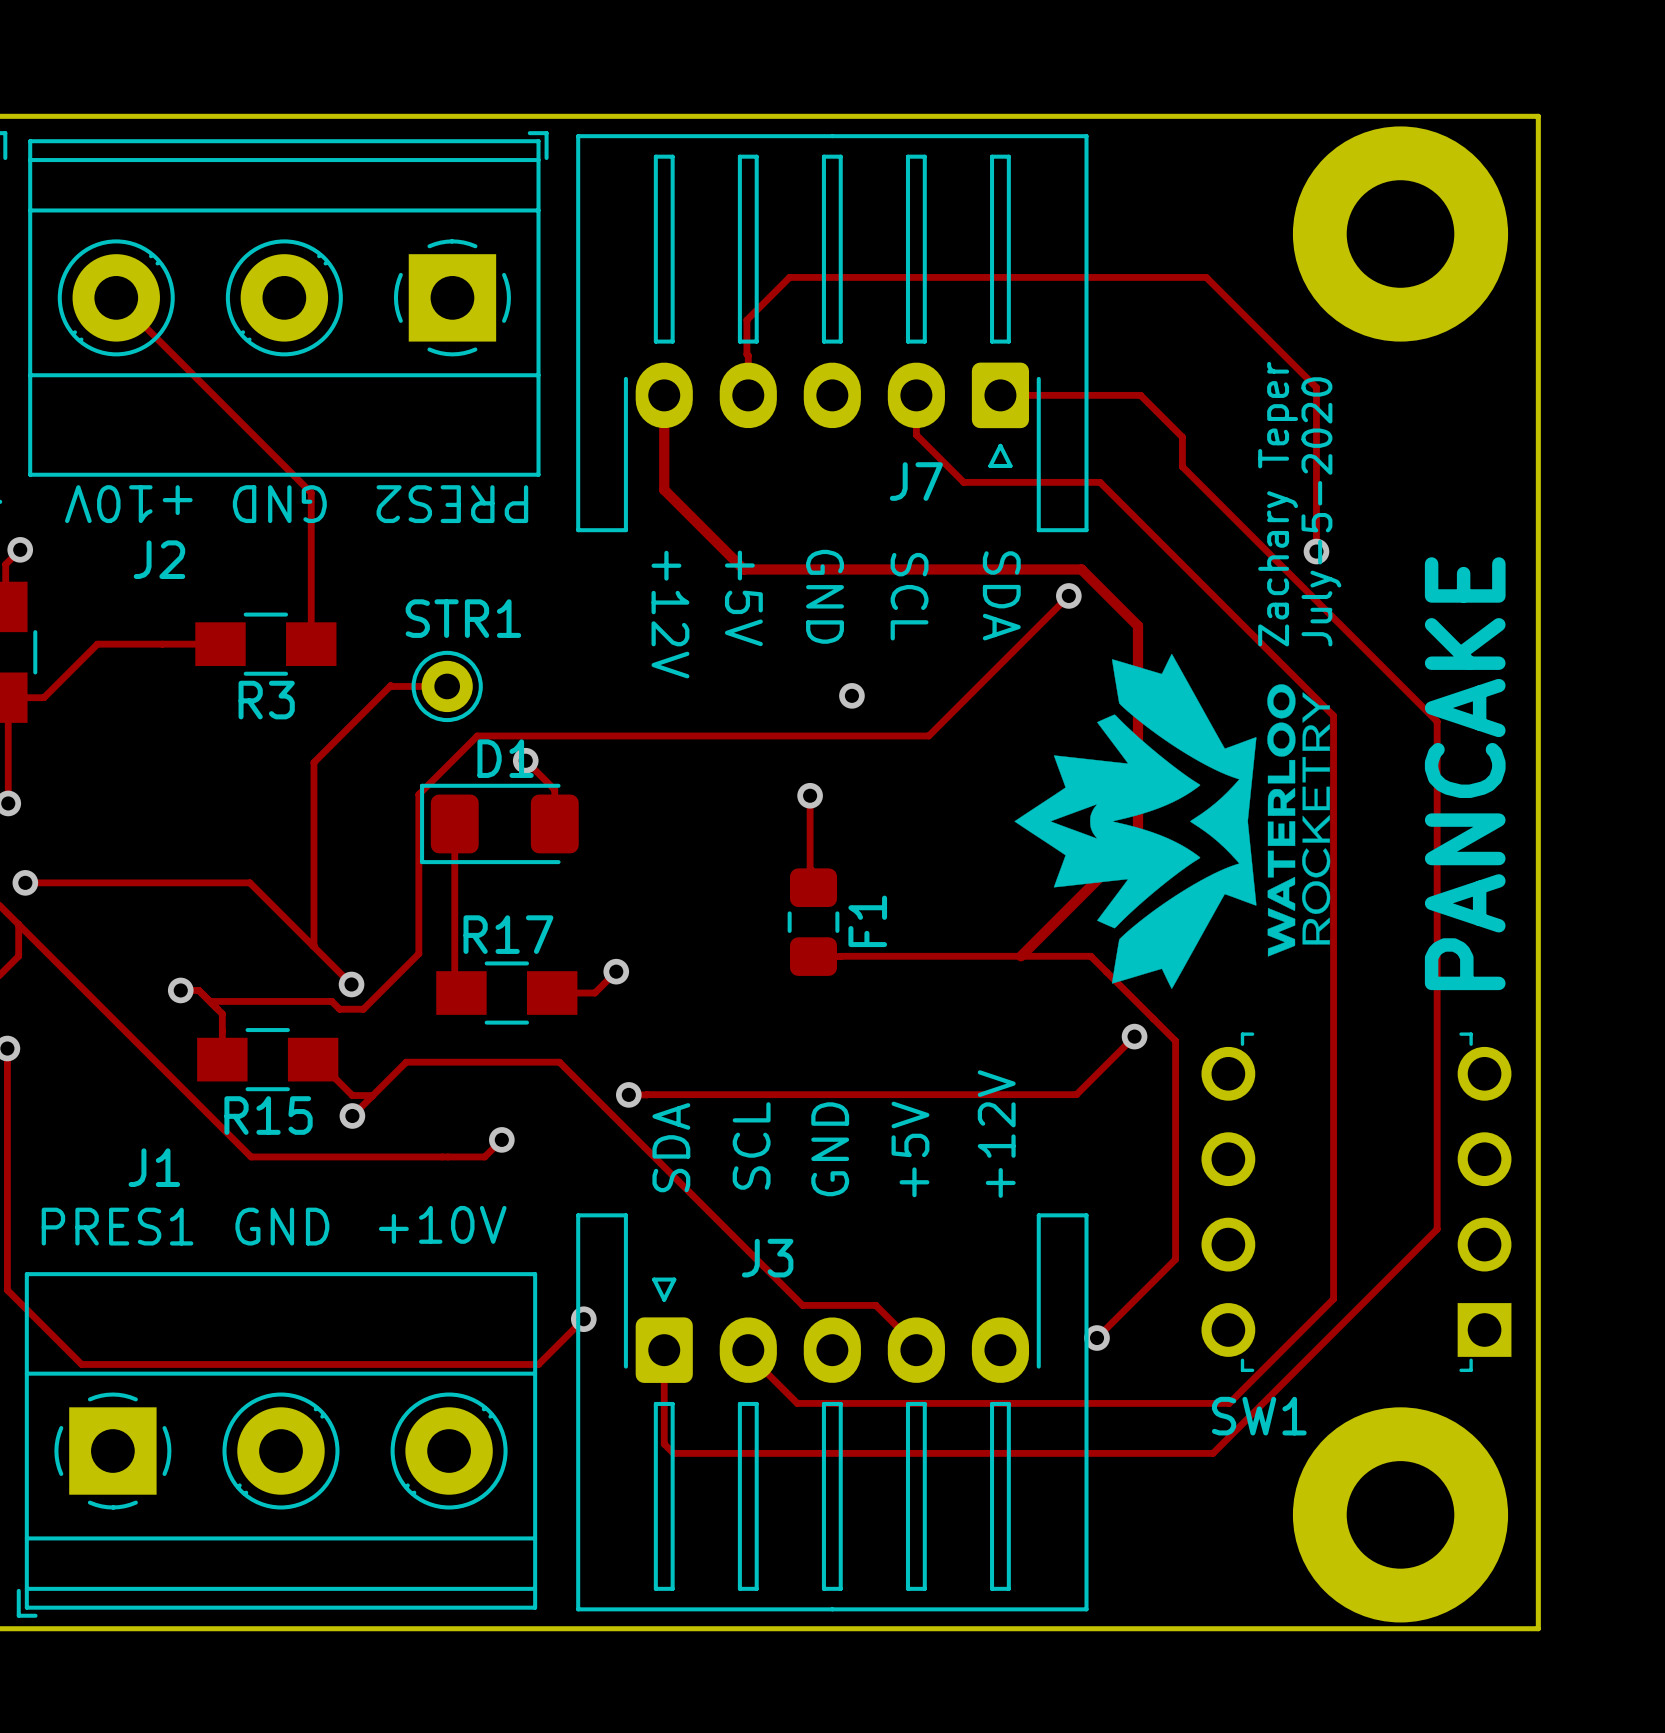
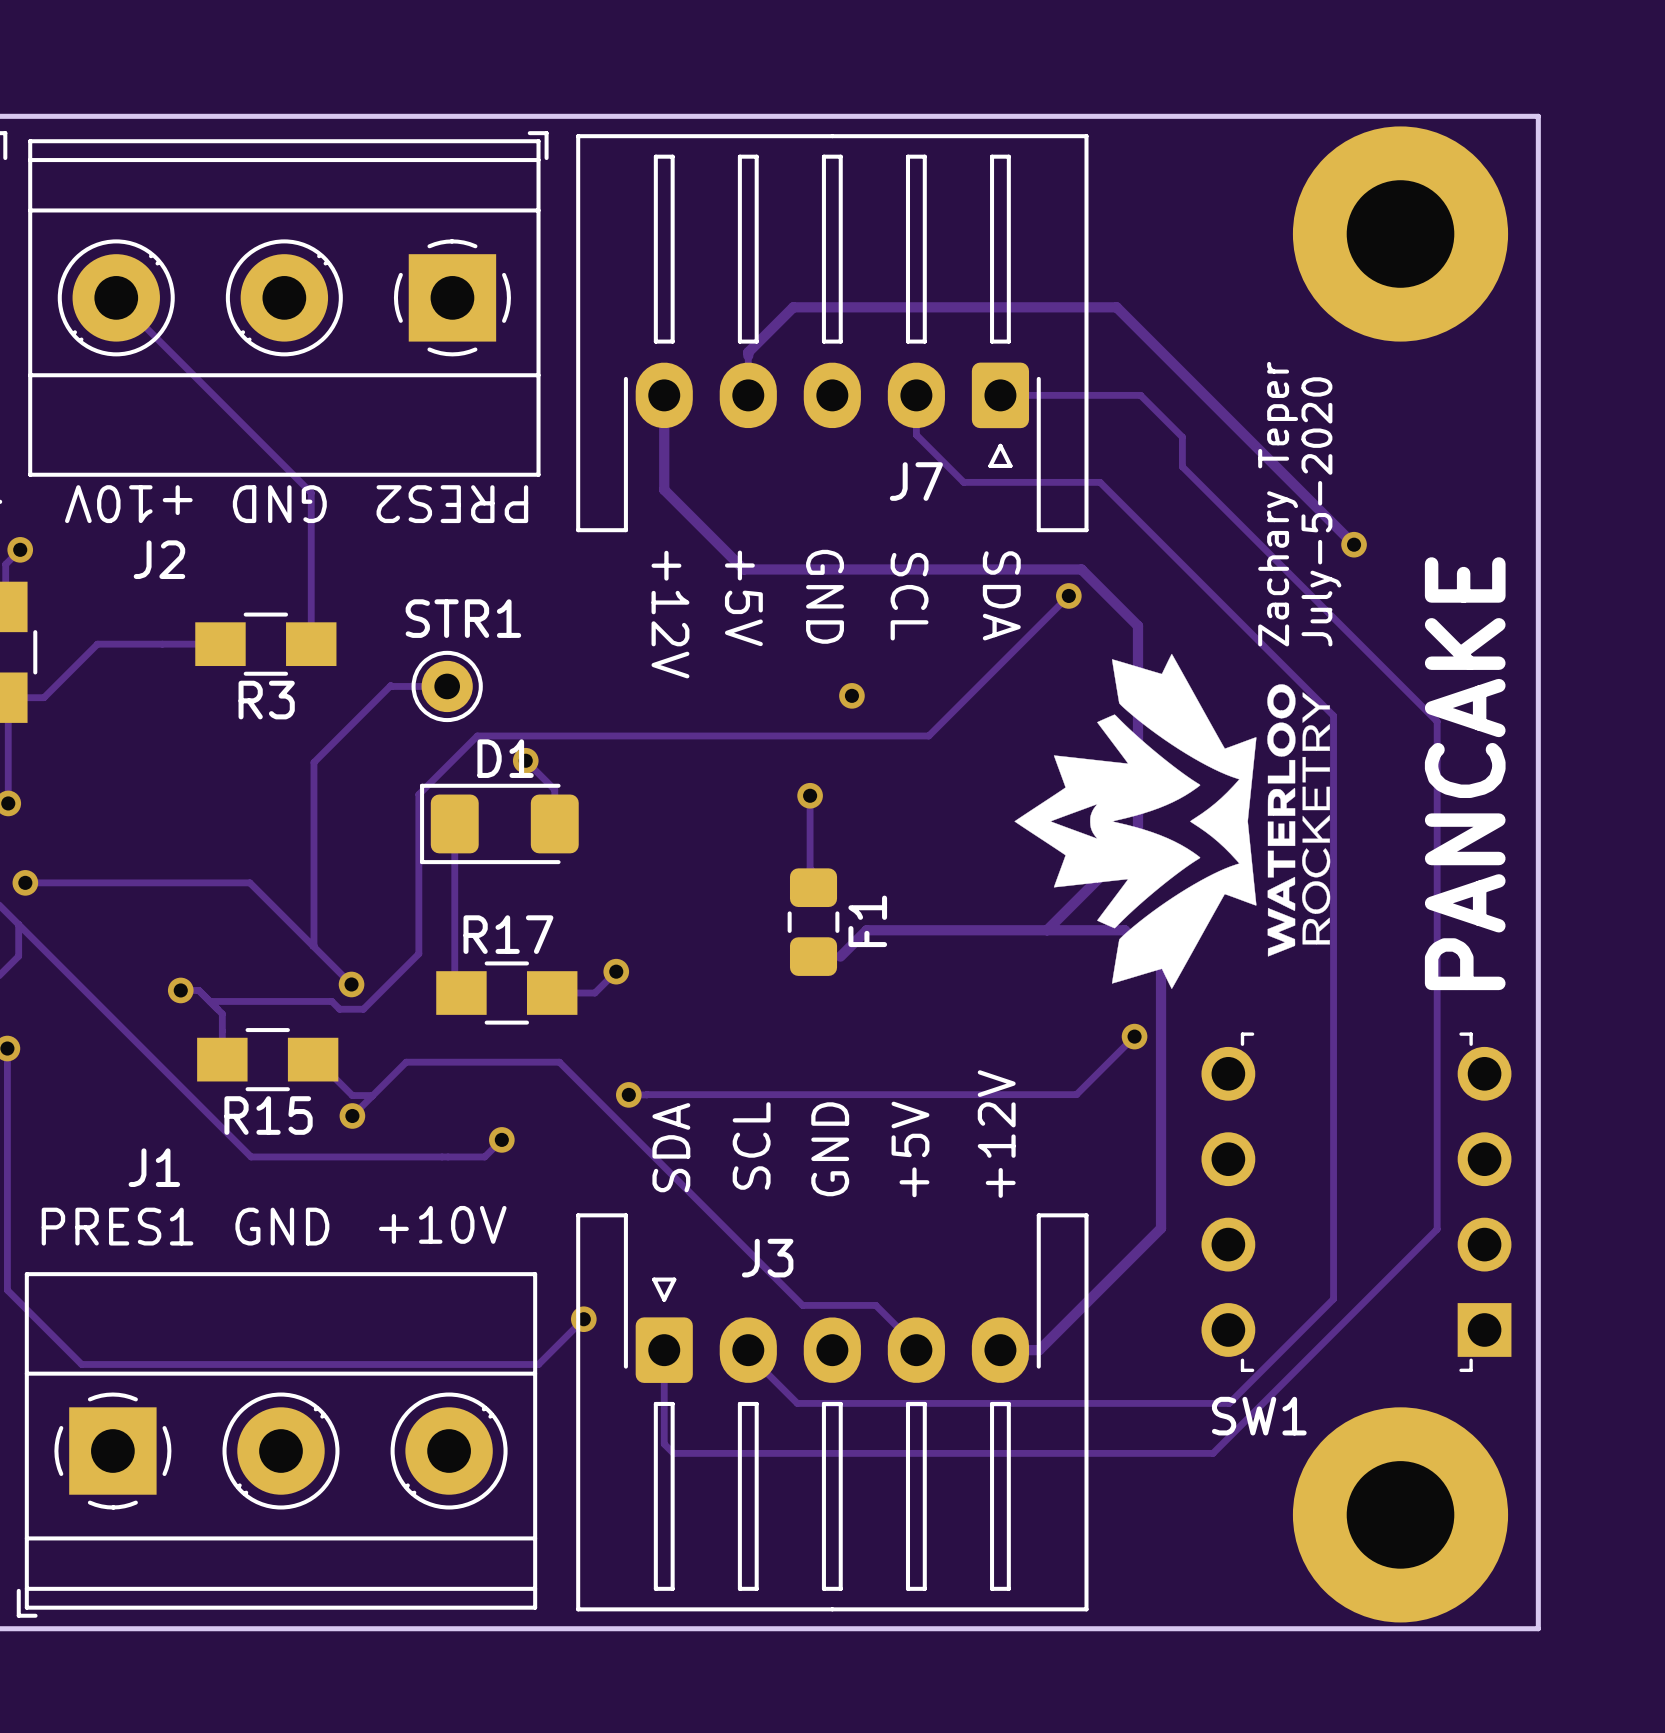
track: (748, 355) (746, 320) (789, 277) (1206, 277) (1316, 387) (1316, 551) -> (748, 355) (748, 352) (793, 307) (1116, 307) (1354, 544)
via position: (1316, 551) -> (1354, 544)
track: (1047, 930) (1021, 956) -> none
track: (840, 956) (1090, 956) (1175, 1040) (1175, 1259) (1097, 1338) -> (840, 956) (866, 930) (1124, 930) (1161, 966) (1161, 1228) (1039, 1350) (1000, 1350)
via: (1097, 1338) -> none

